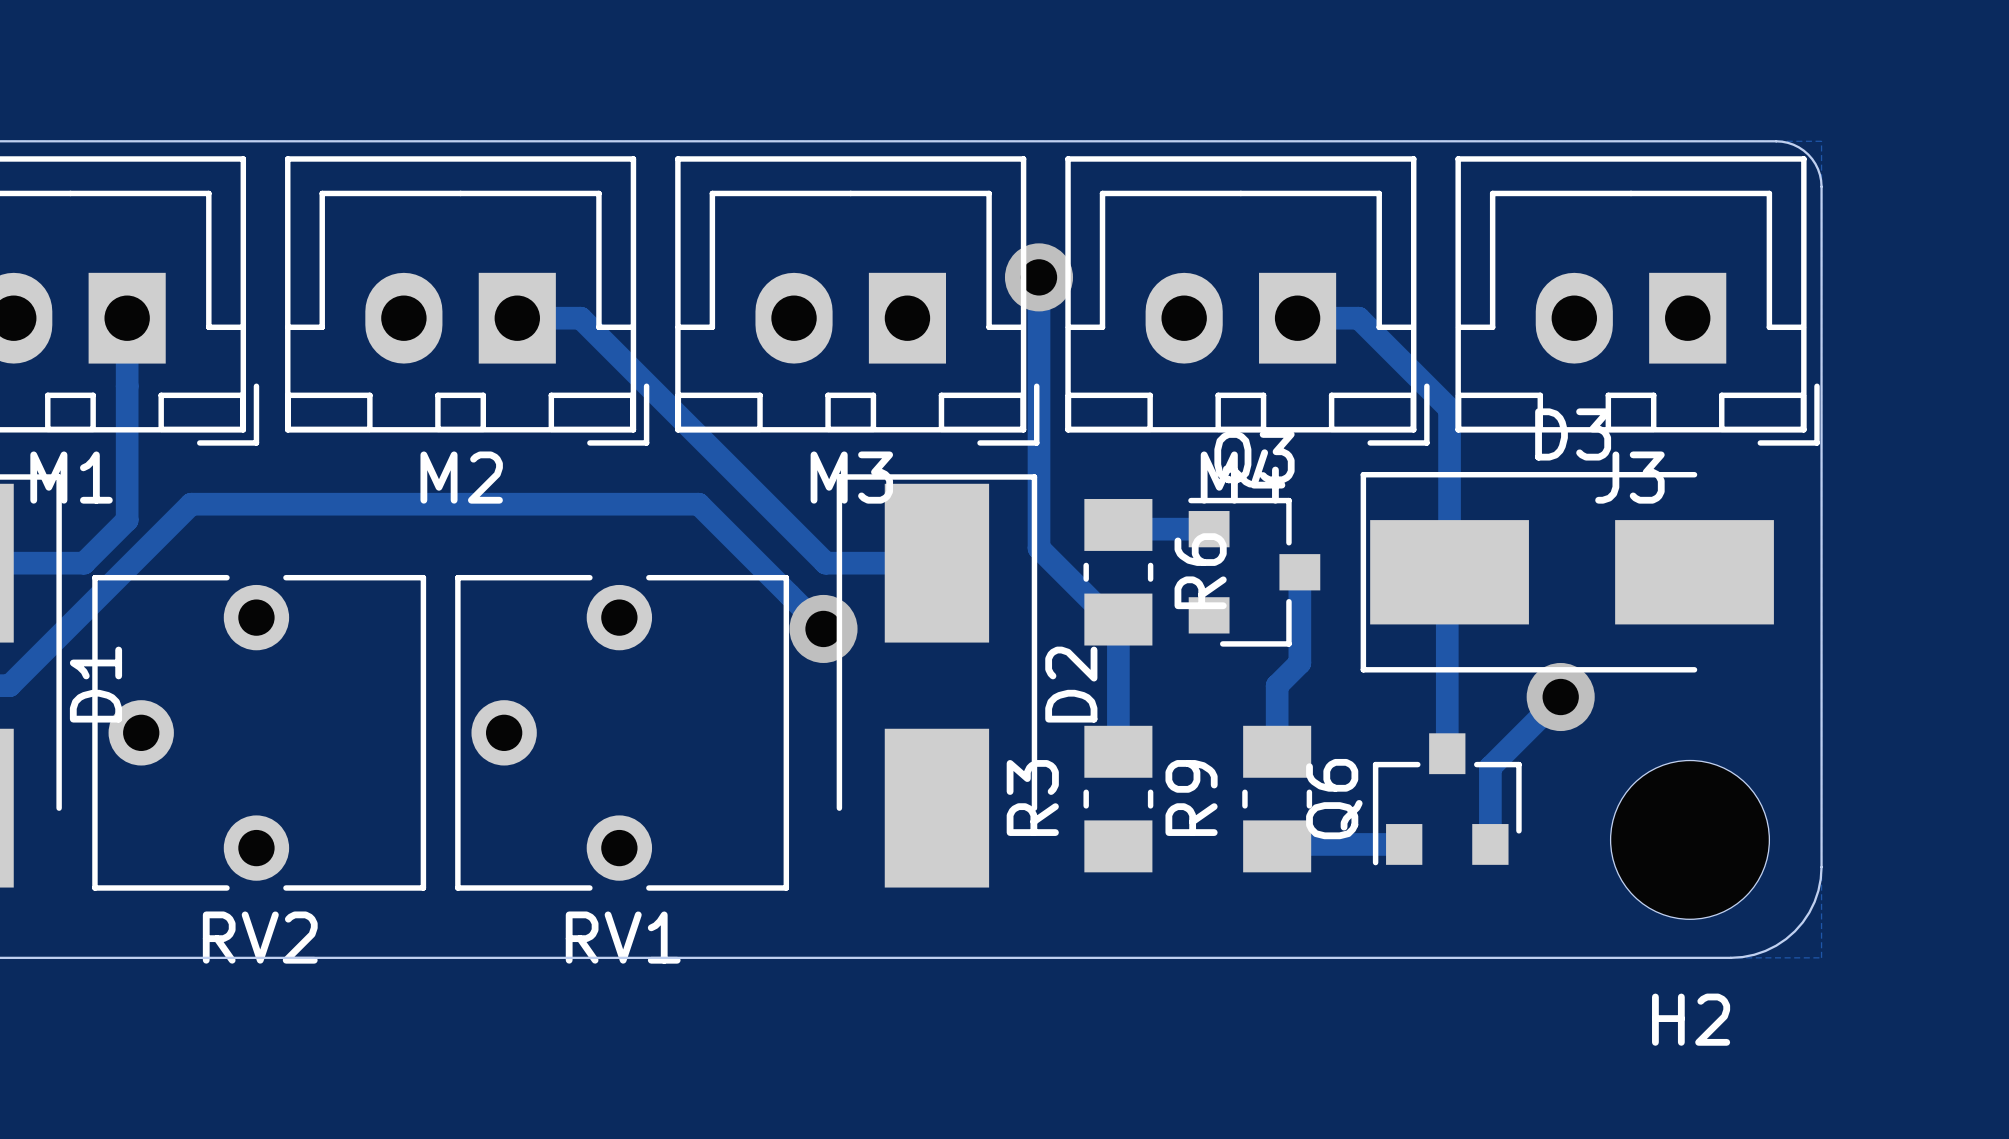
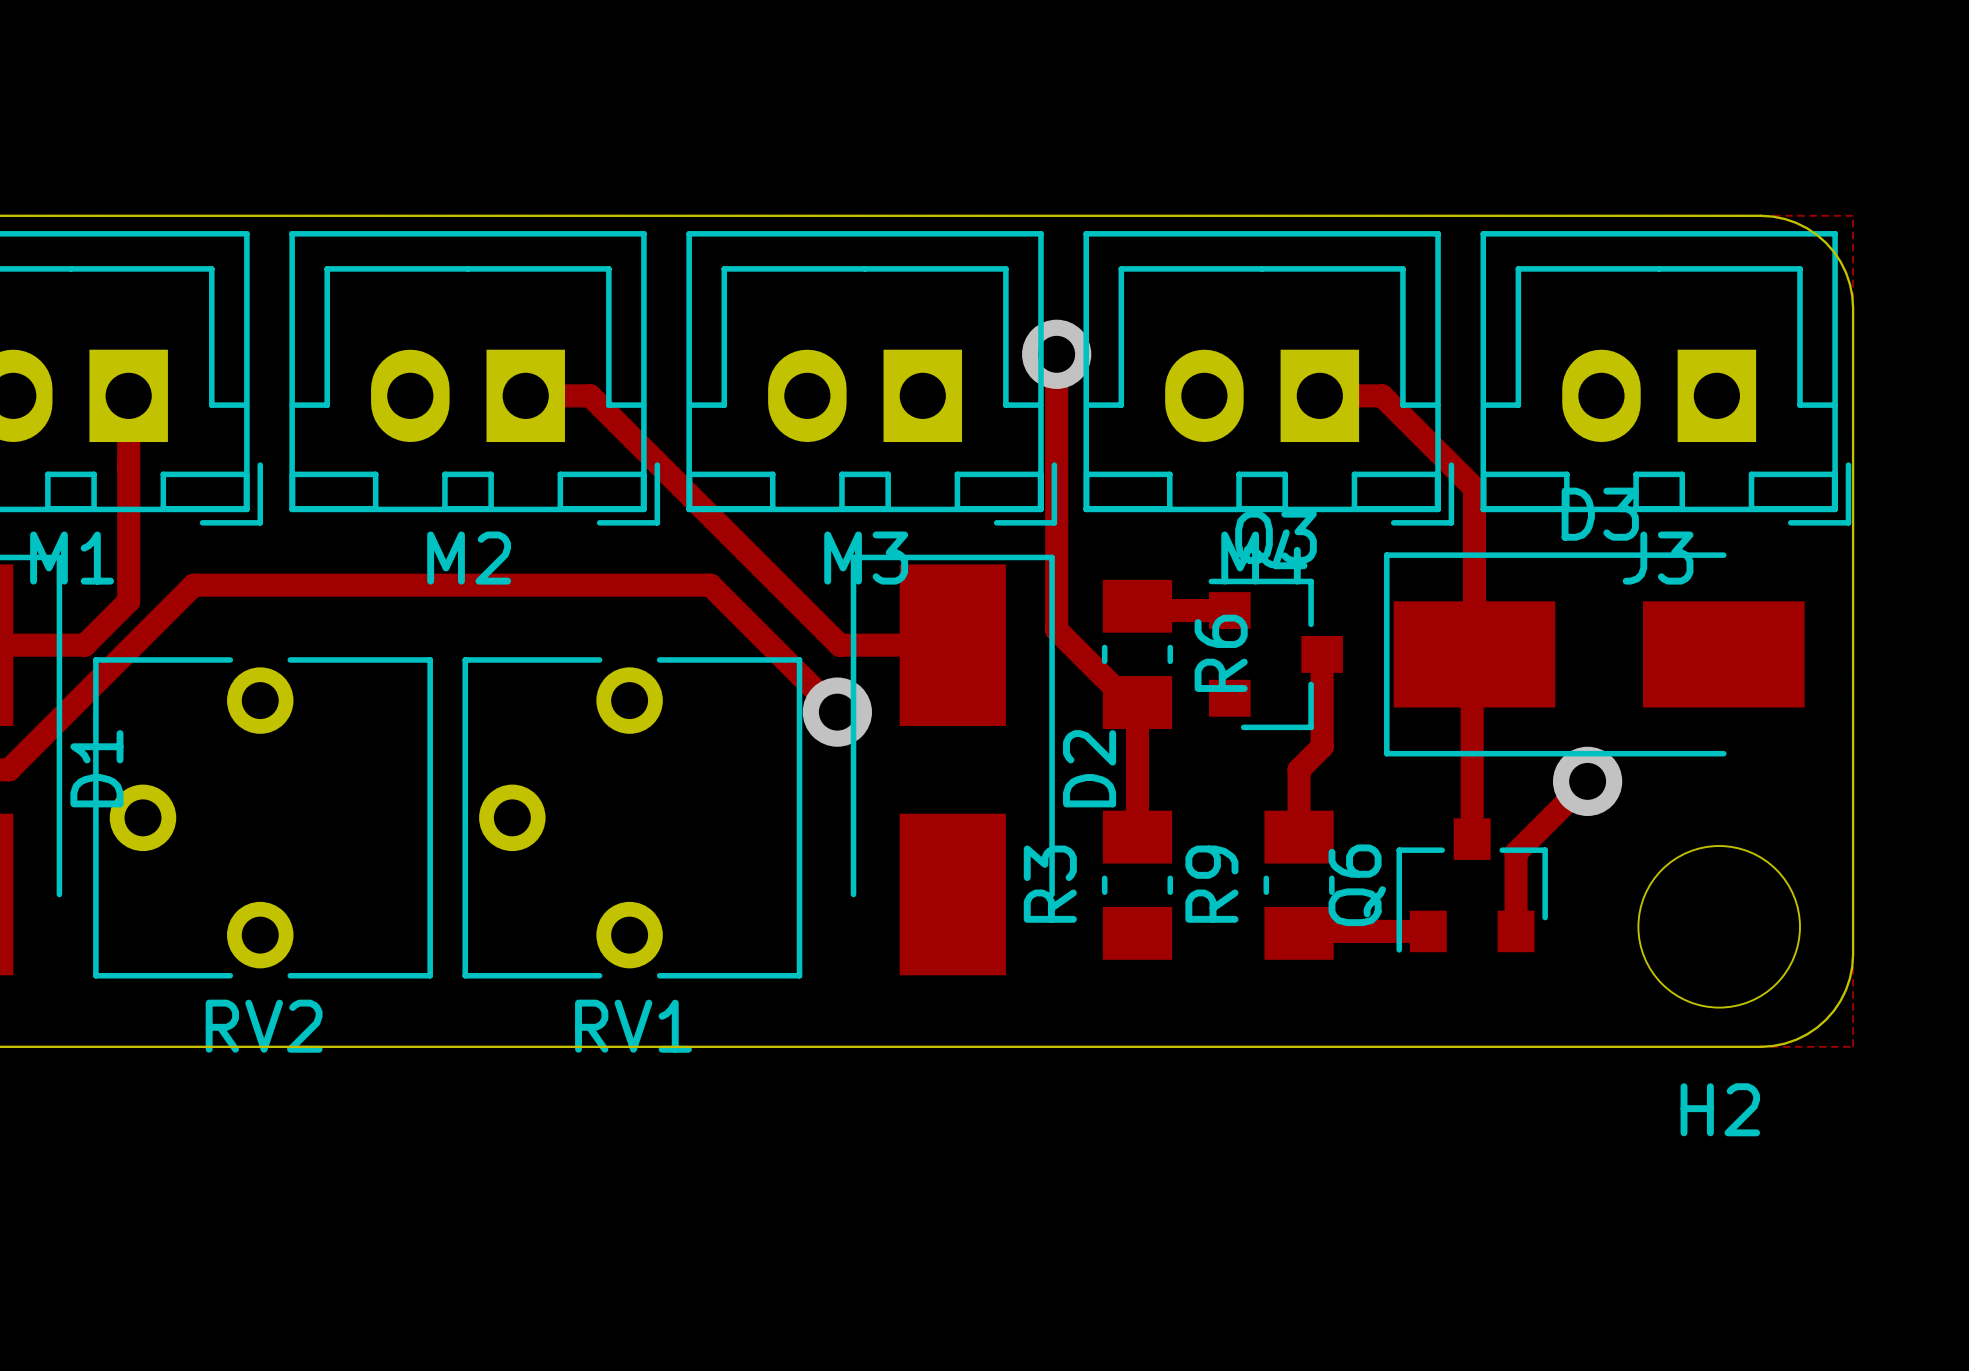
board edge: (1730, 141) (1782, 141) (1793, 144) (1808, 154) (1815, 163) (1821, 180) (1821, 232) -> (1760, 215) (1784, 218) (1796, 222) (1816, 234) (1826, 242) (1834, 251) (1846, 272) (1852, 296) (1853, 308)

